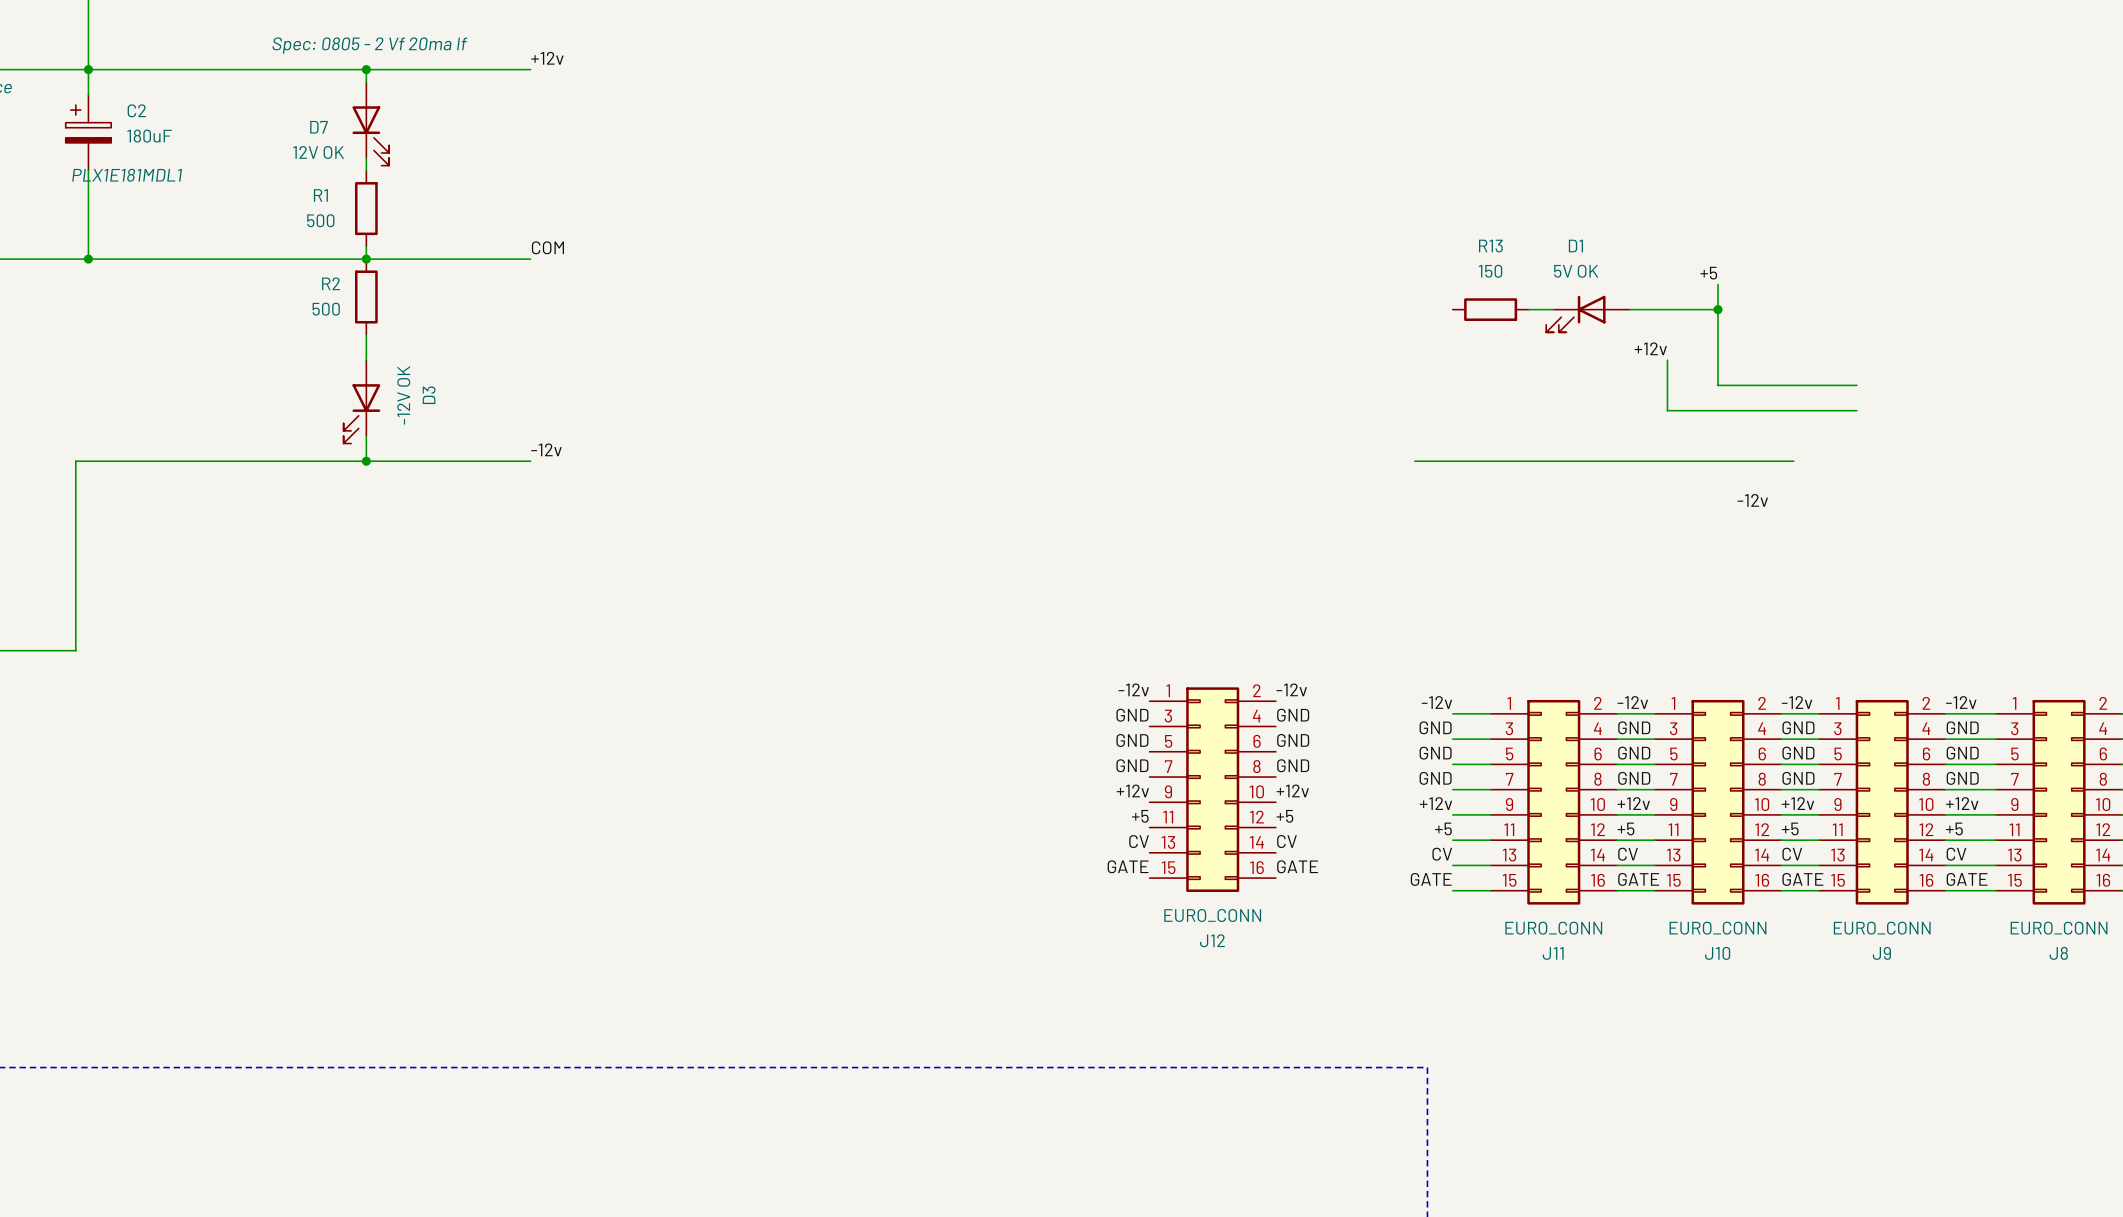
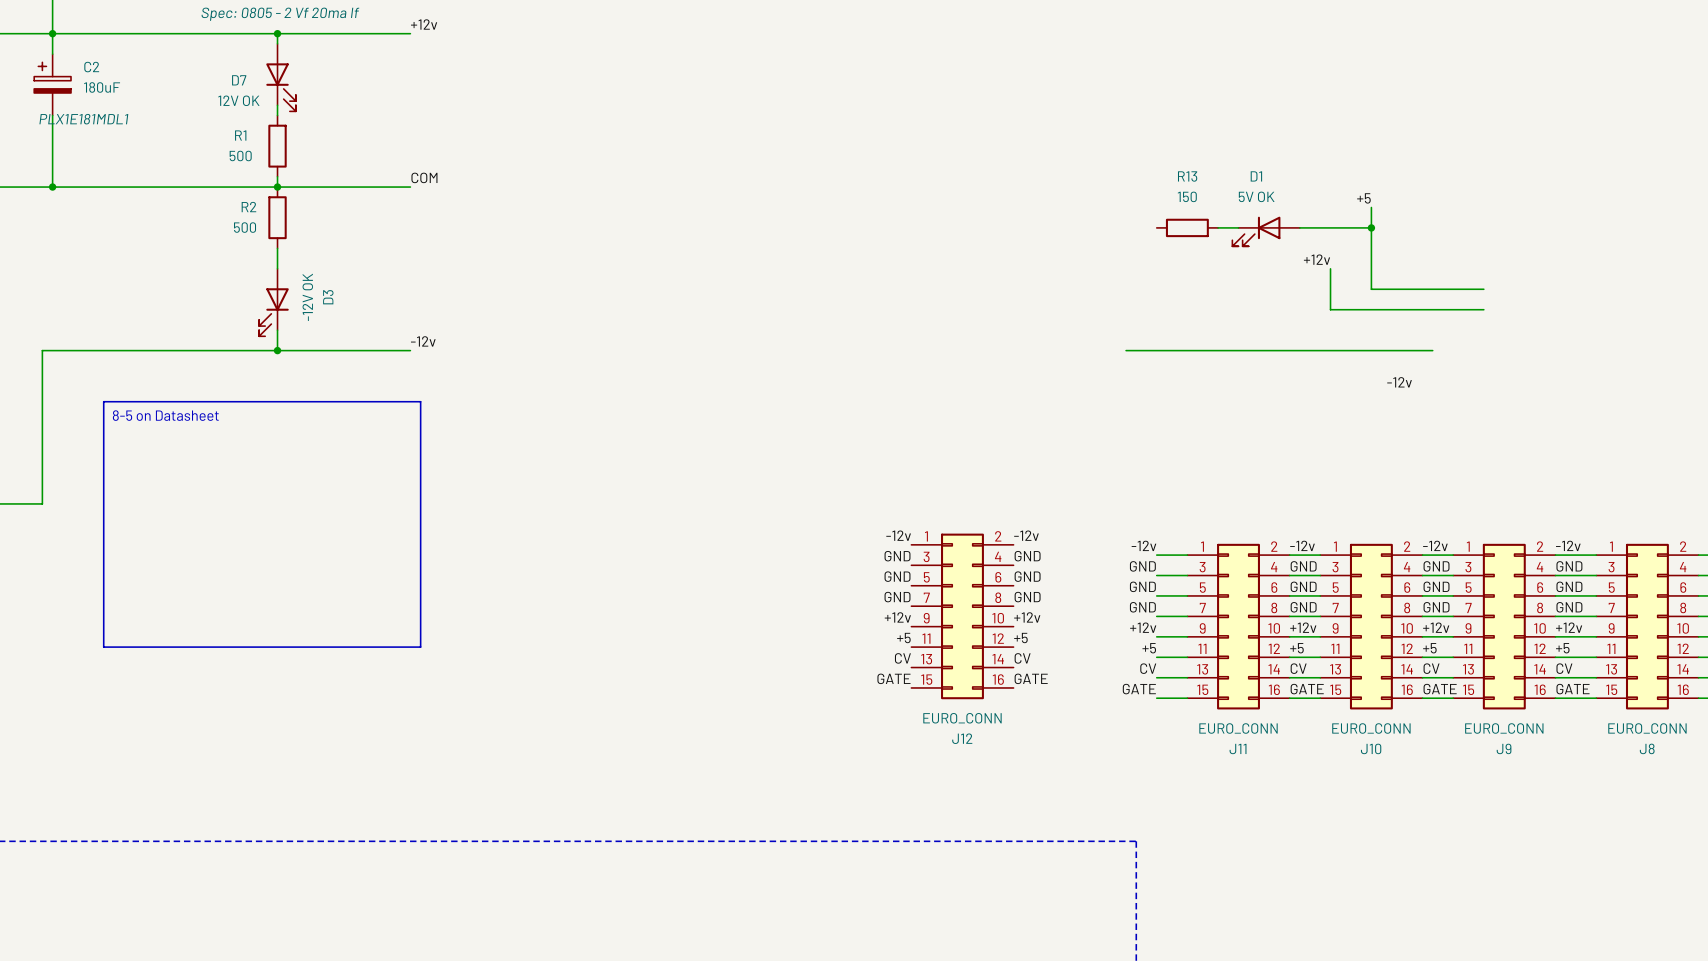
line: none -> (103, 401) (420, 401) (420, 647) (103, 647) (103, 401)
text: none -> 8-5 on Datasheet (165, 415)

